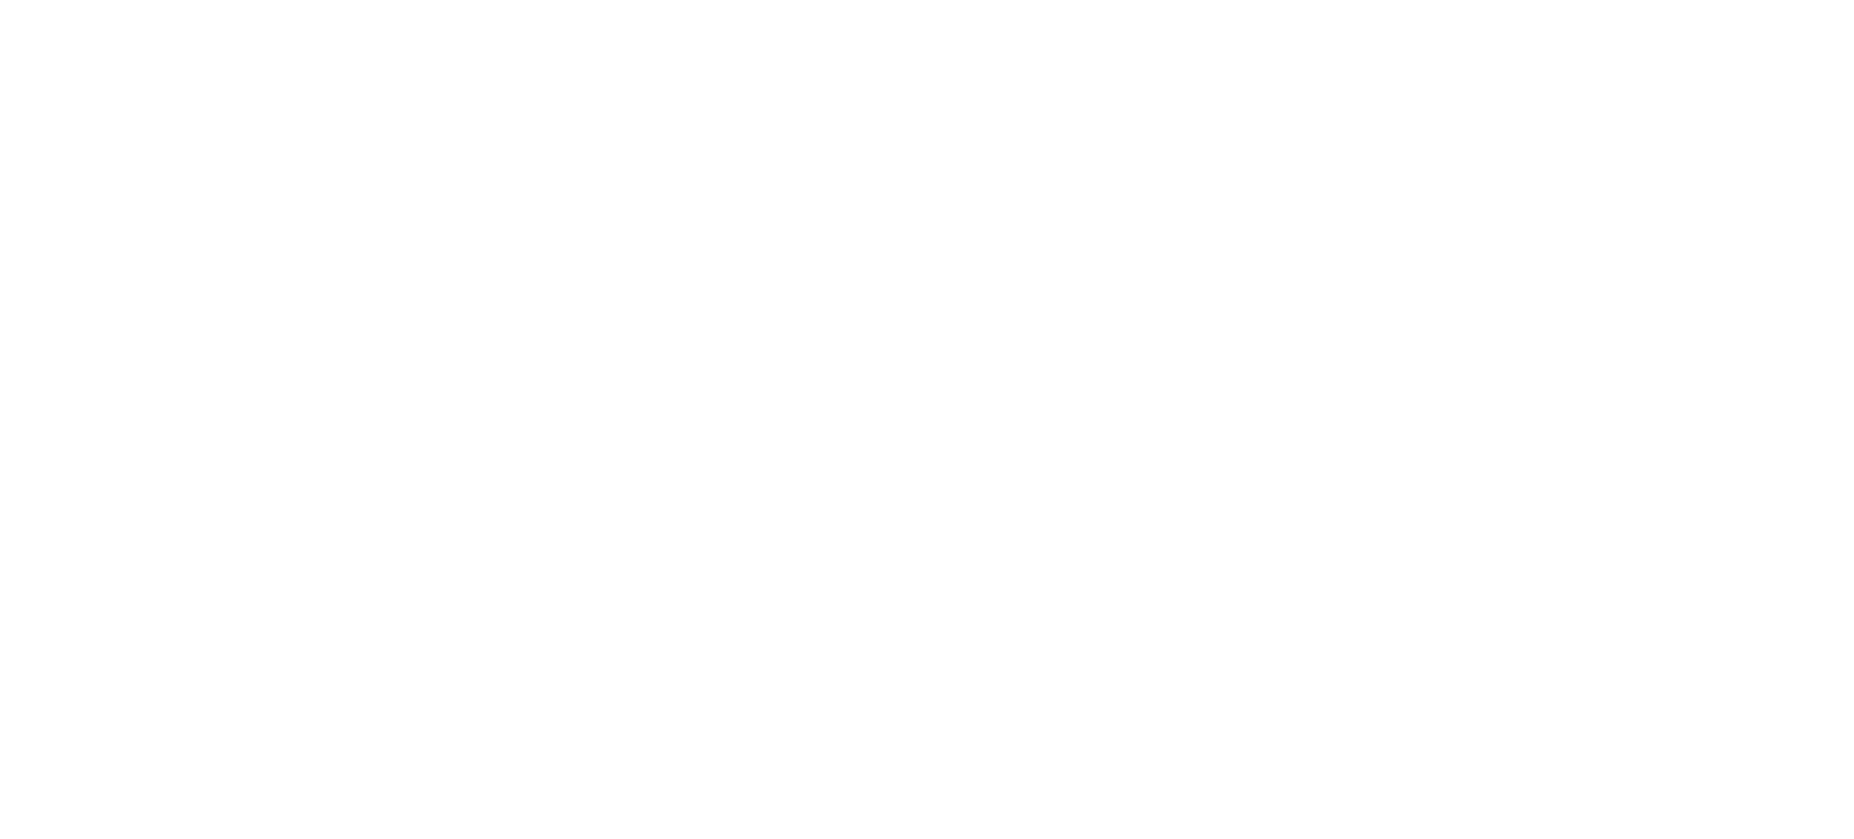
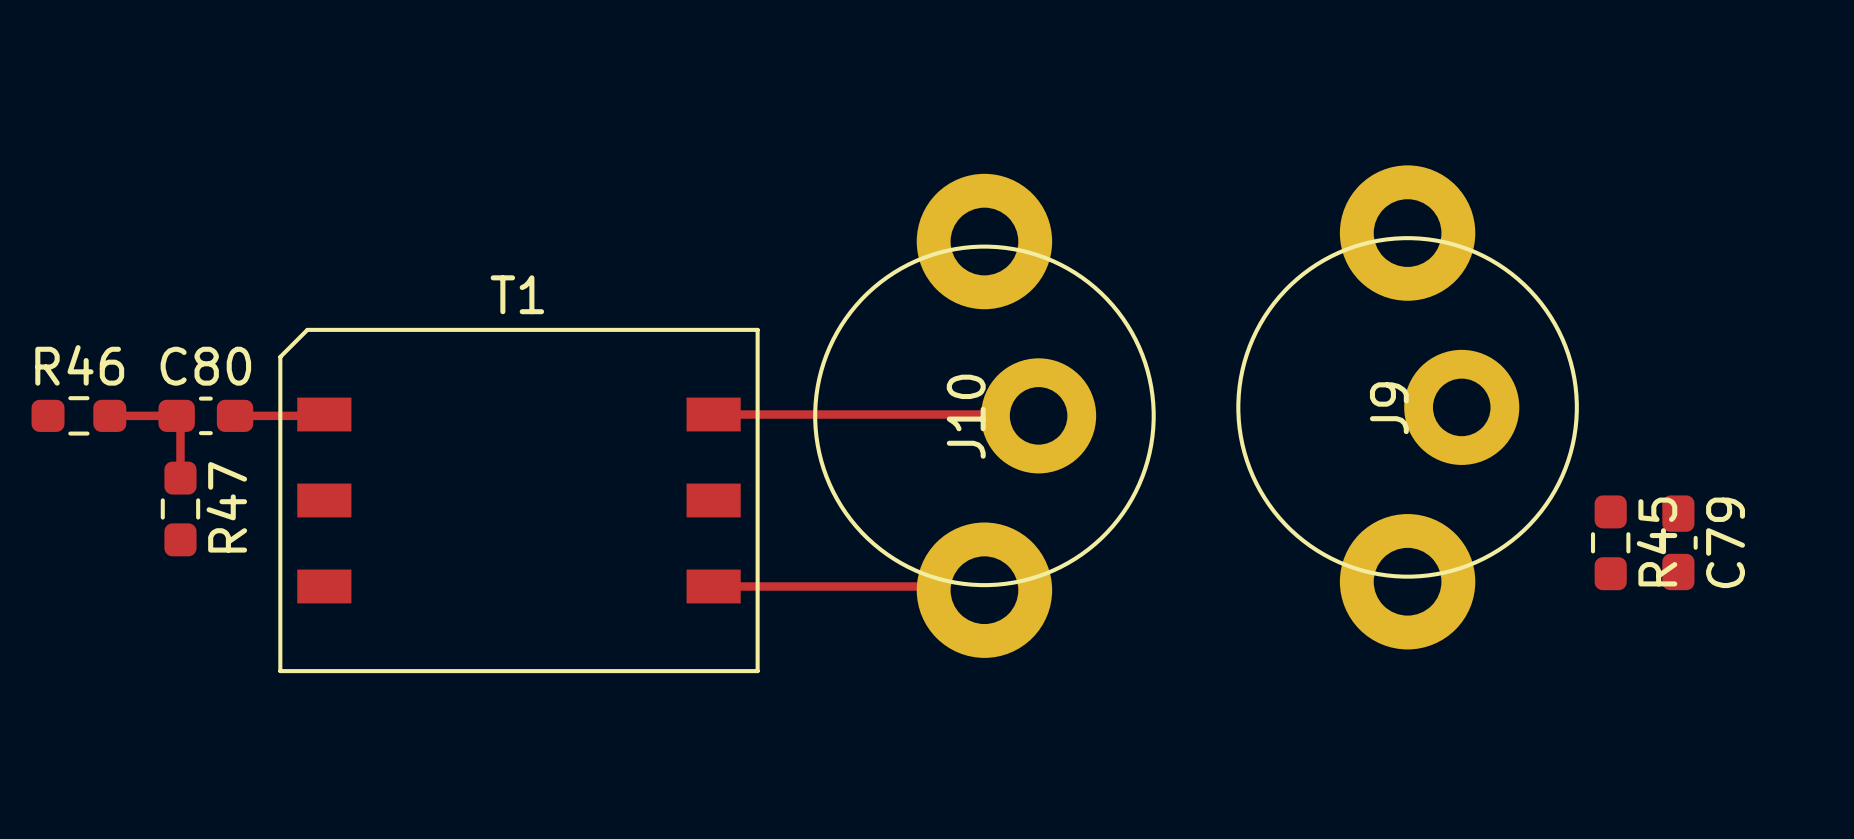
J9: none -> (1407, 407)
top track: none -> (324, 414) (235, 415)
top track: none -> (713, 414) (1038, 415)
R46: none -> (78, 415)
top track: none -> (109, 415) (176, 415) (180, 419) (180, 478)
C80: none -> (205, 415)
J10: none -> (984, 415)
T1: none -> (518, 500)
R47: none -> (180, 508)
R45: none -> (1610, 542)
C79: none -> (1678, 542)
top track: none -> (713, 586) (980, 586) (984, 590)

